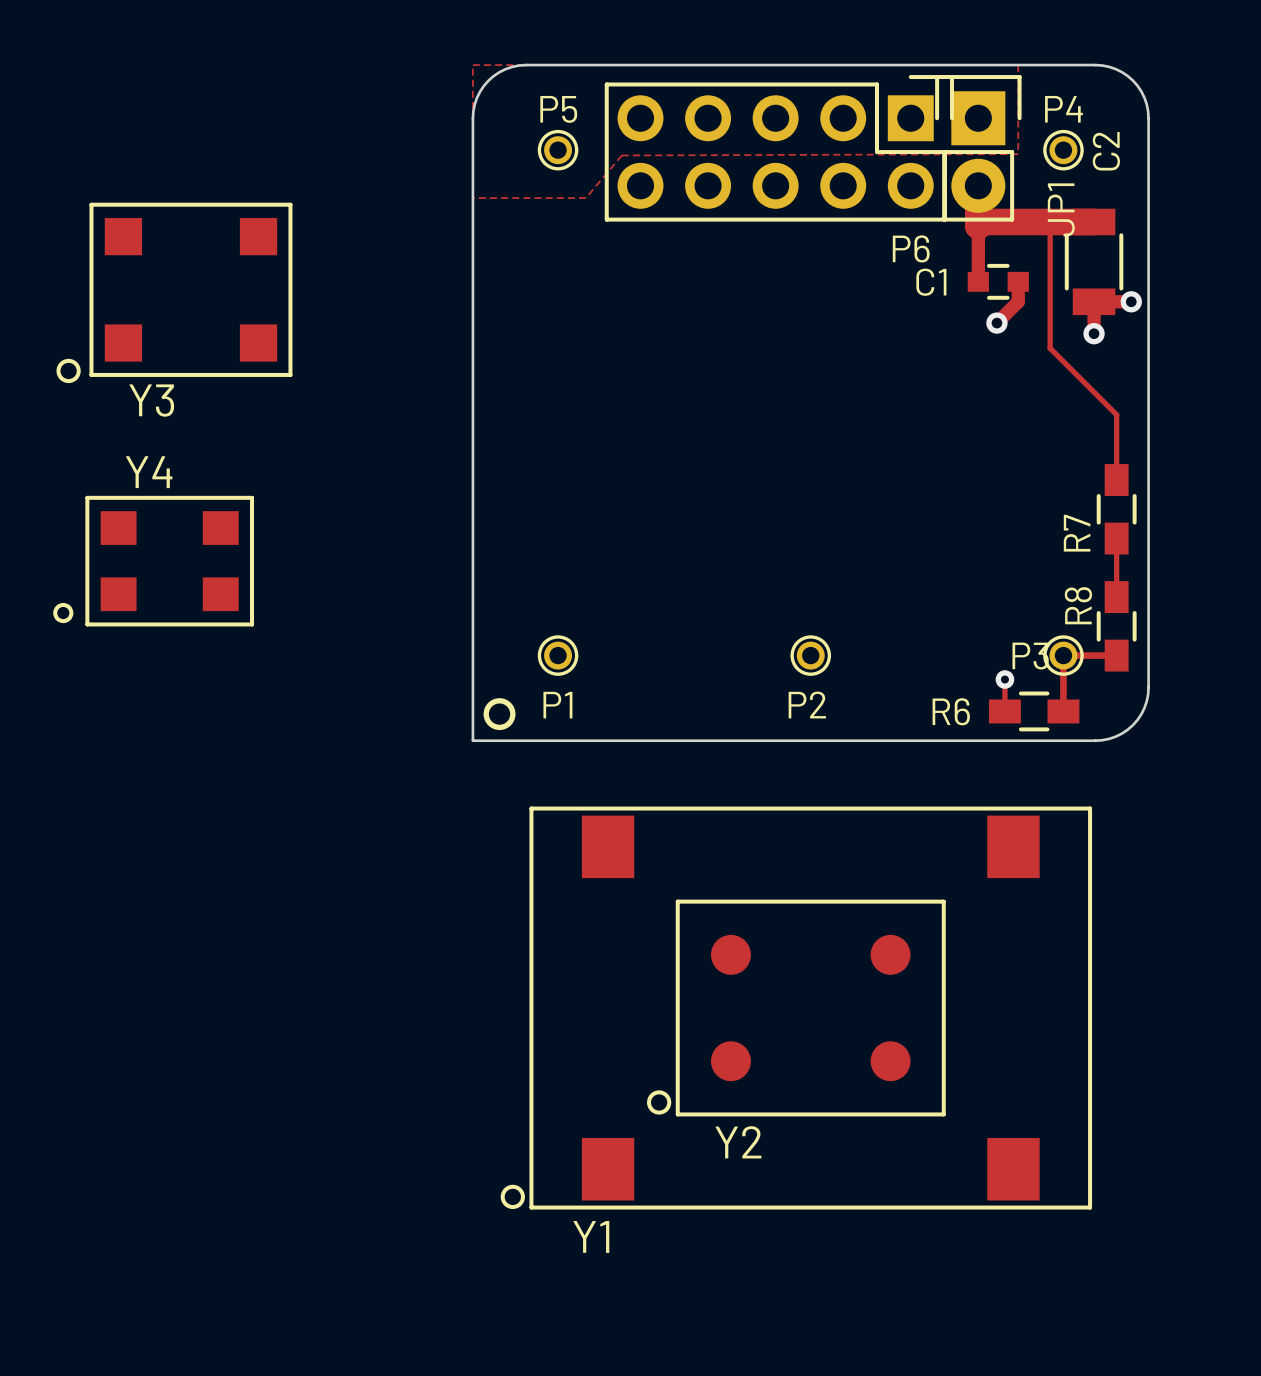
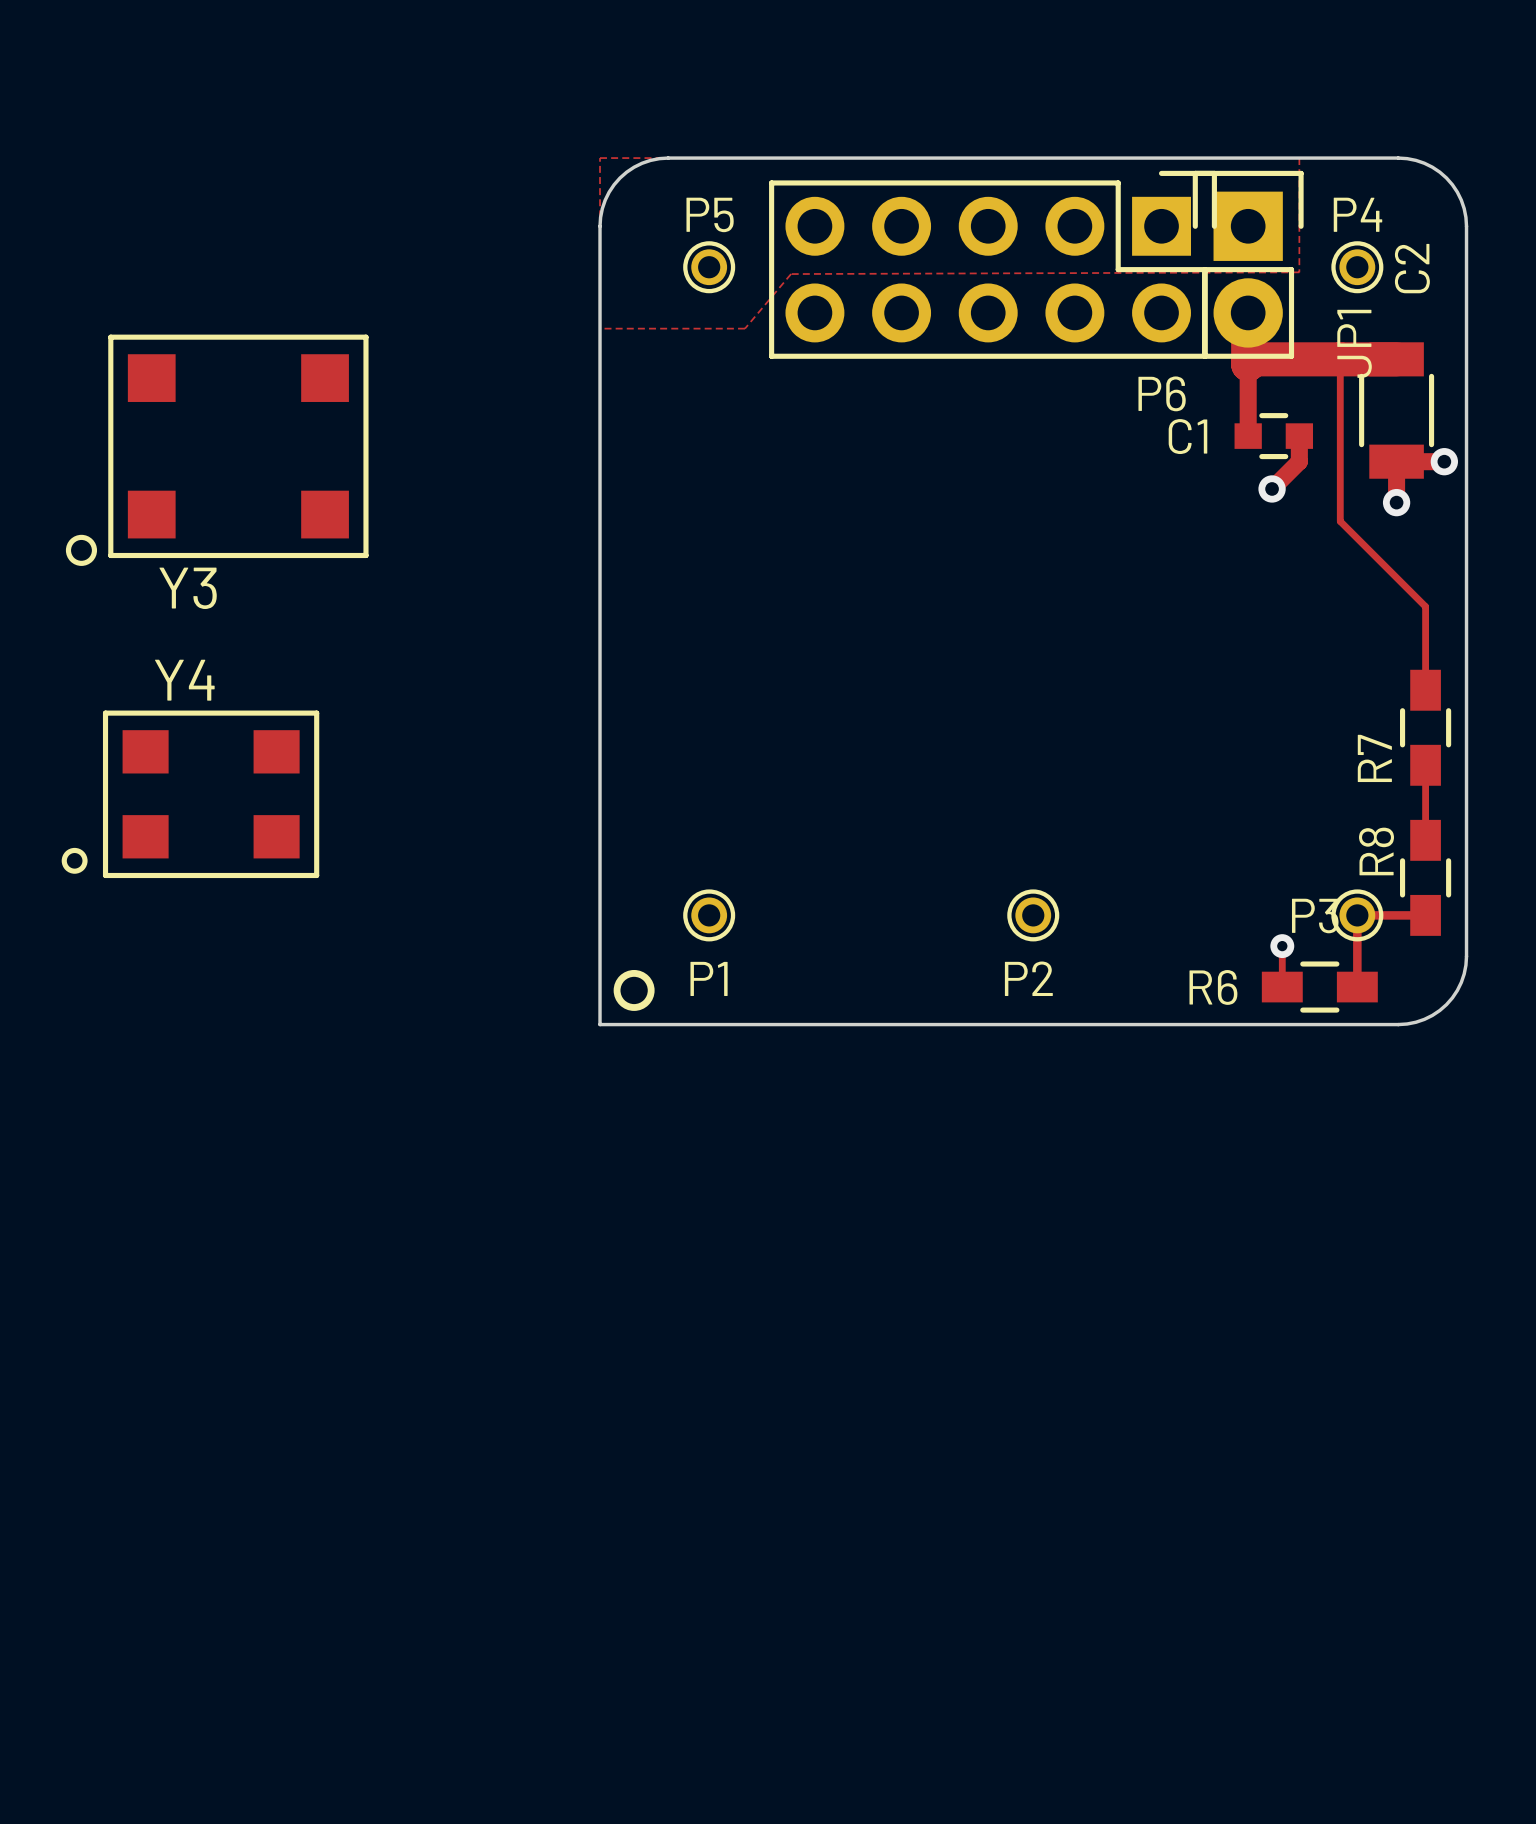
Y1: (796, 1008) -> none
Y2: (796, 1008) -> none

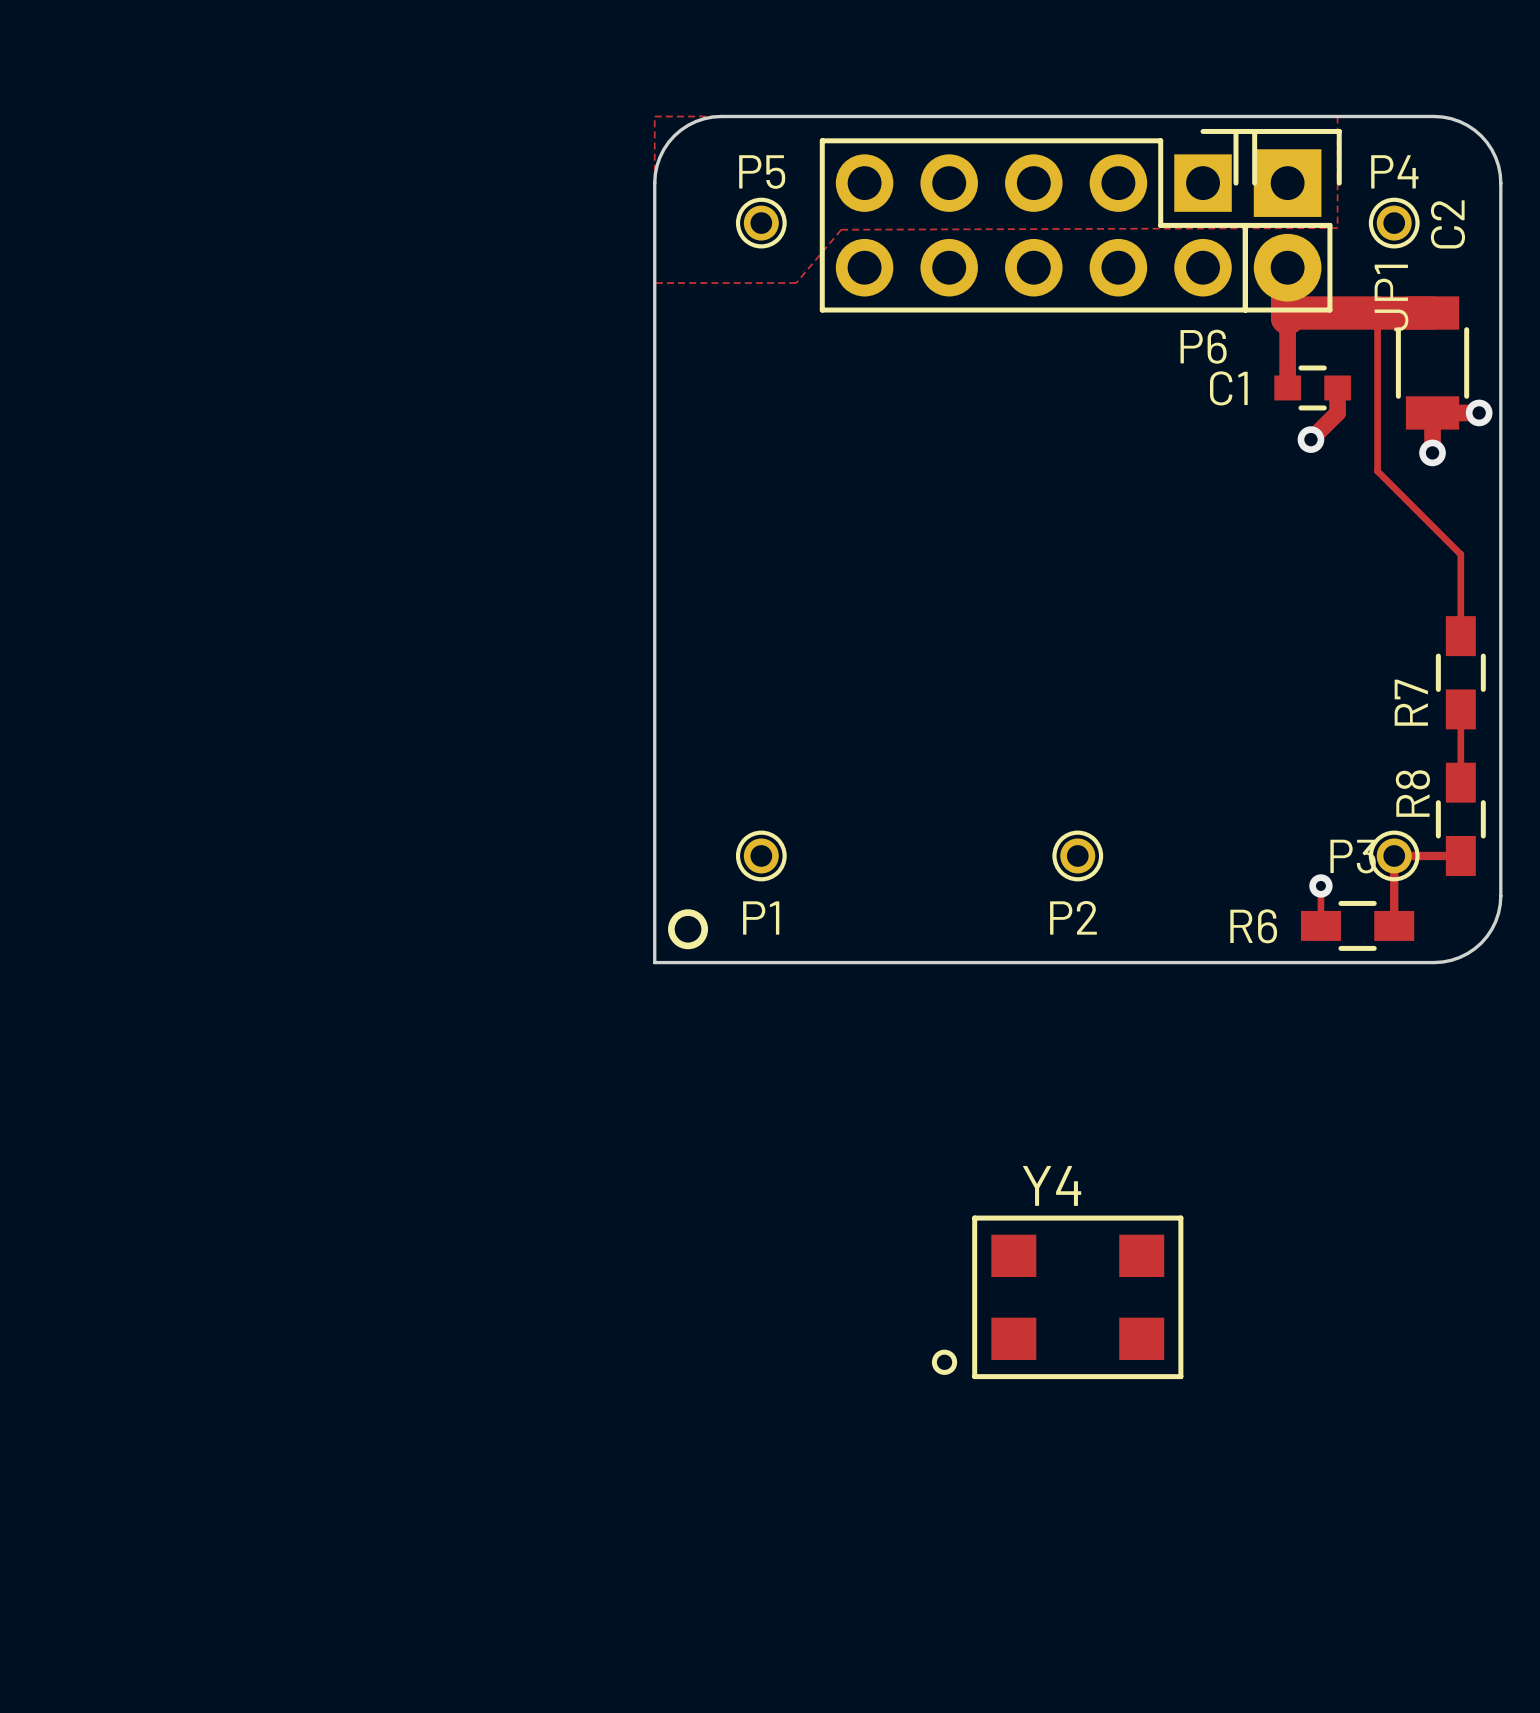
Y3: (217, 450) -> none
Y4 position: (190, 794) -> (1057, 1297)

